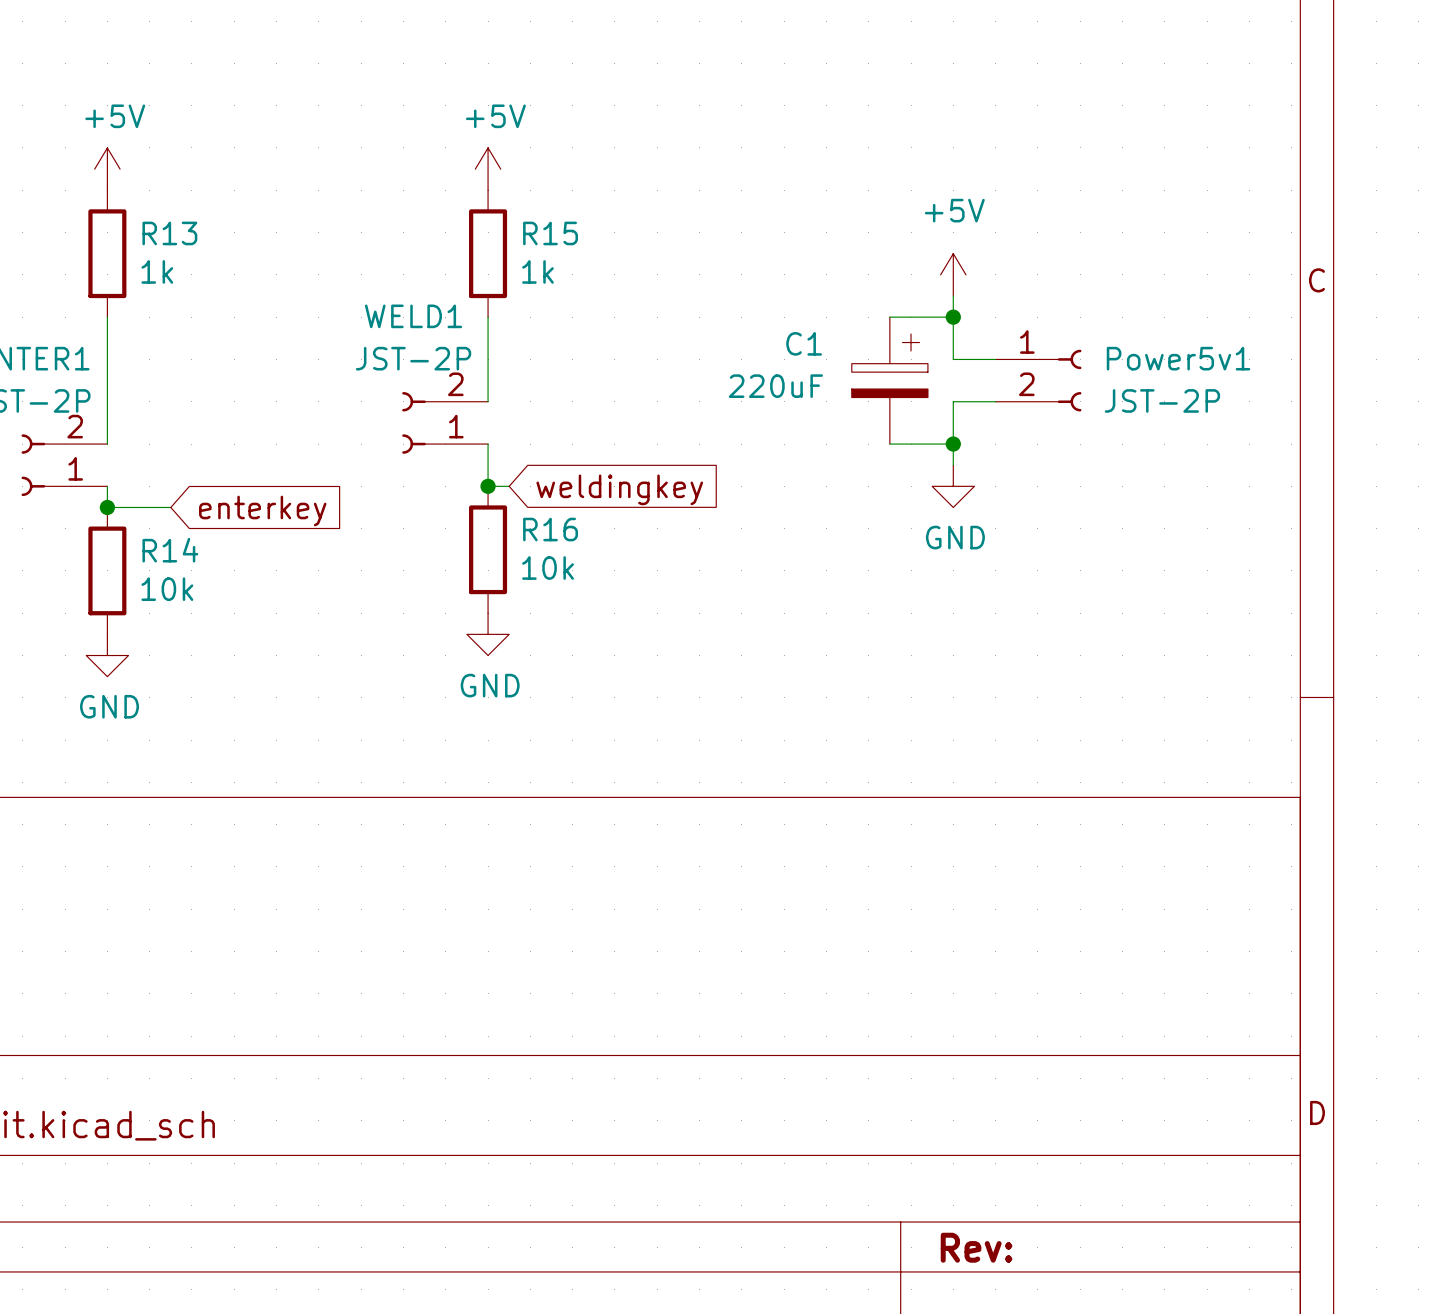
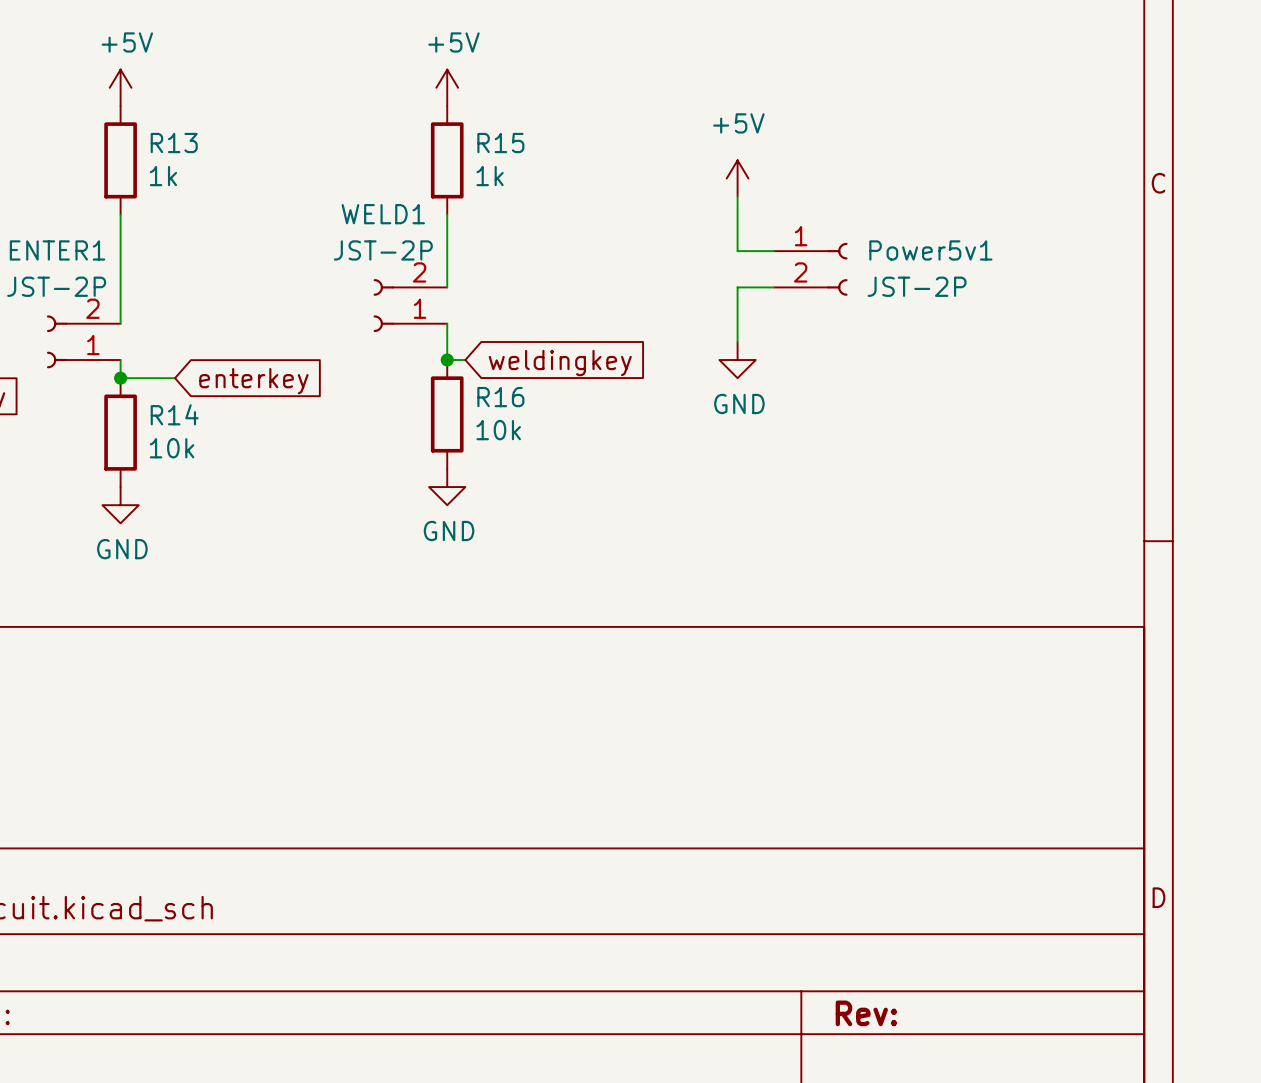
power symbol position: +5V (953, 274) -> +5V (737, 178)
wire: (953, 296) (953, 359) (995, 359) -> (737, 196) (737, 251) (773, 251)
wire: (889, 317) (953, 317) -> none
junction: (953, 317) -> none
C1: 220uF (889, 380) -> none
Power5v1 position: (1038, 380) -> (810, 269)
wire: (995, 401) (953, 401) (953, 465) -> (773, 287) (737, 287) (737, 341)
wire: (889, 444) (953, 444) -> none
junction: (953, 444) -> none
power symbol position: GND (953, 486) -> GND (737, 360)

